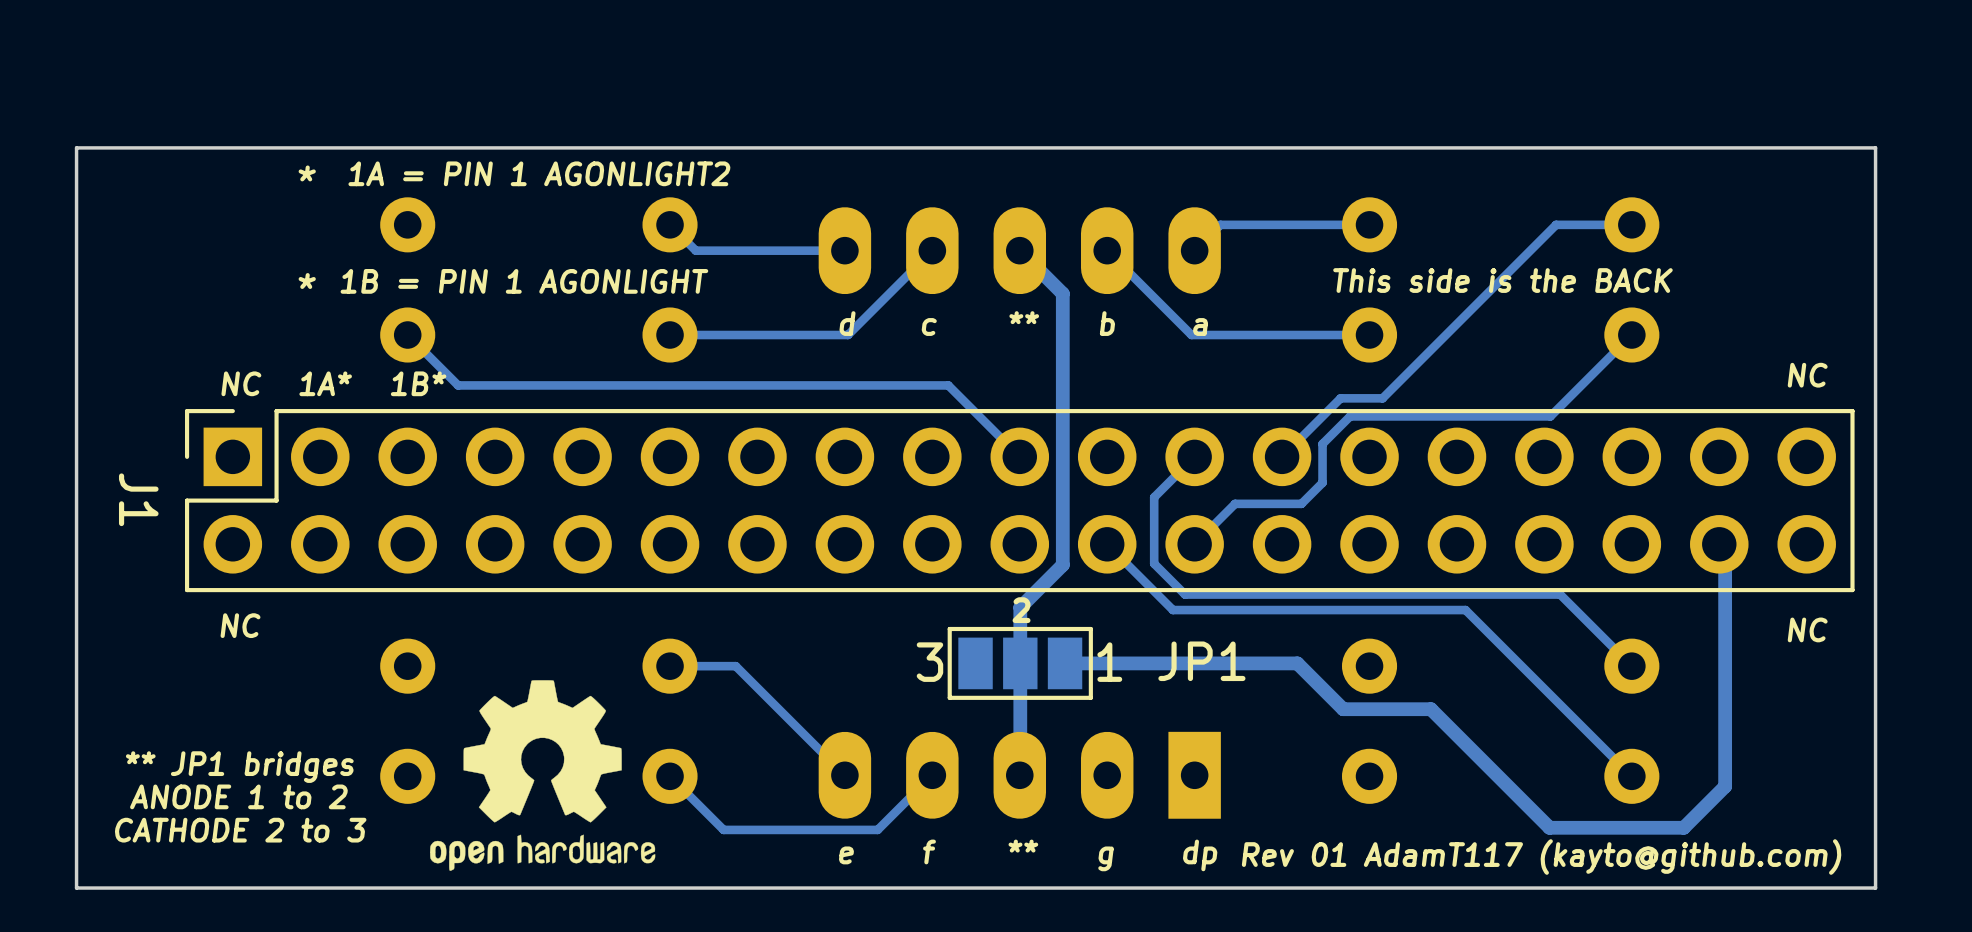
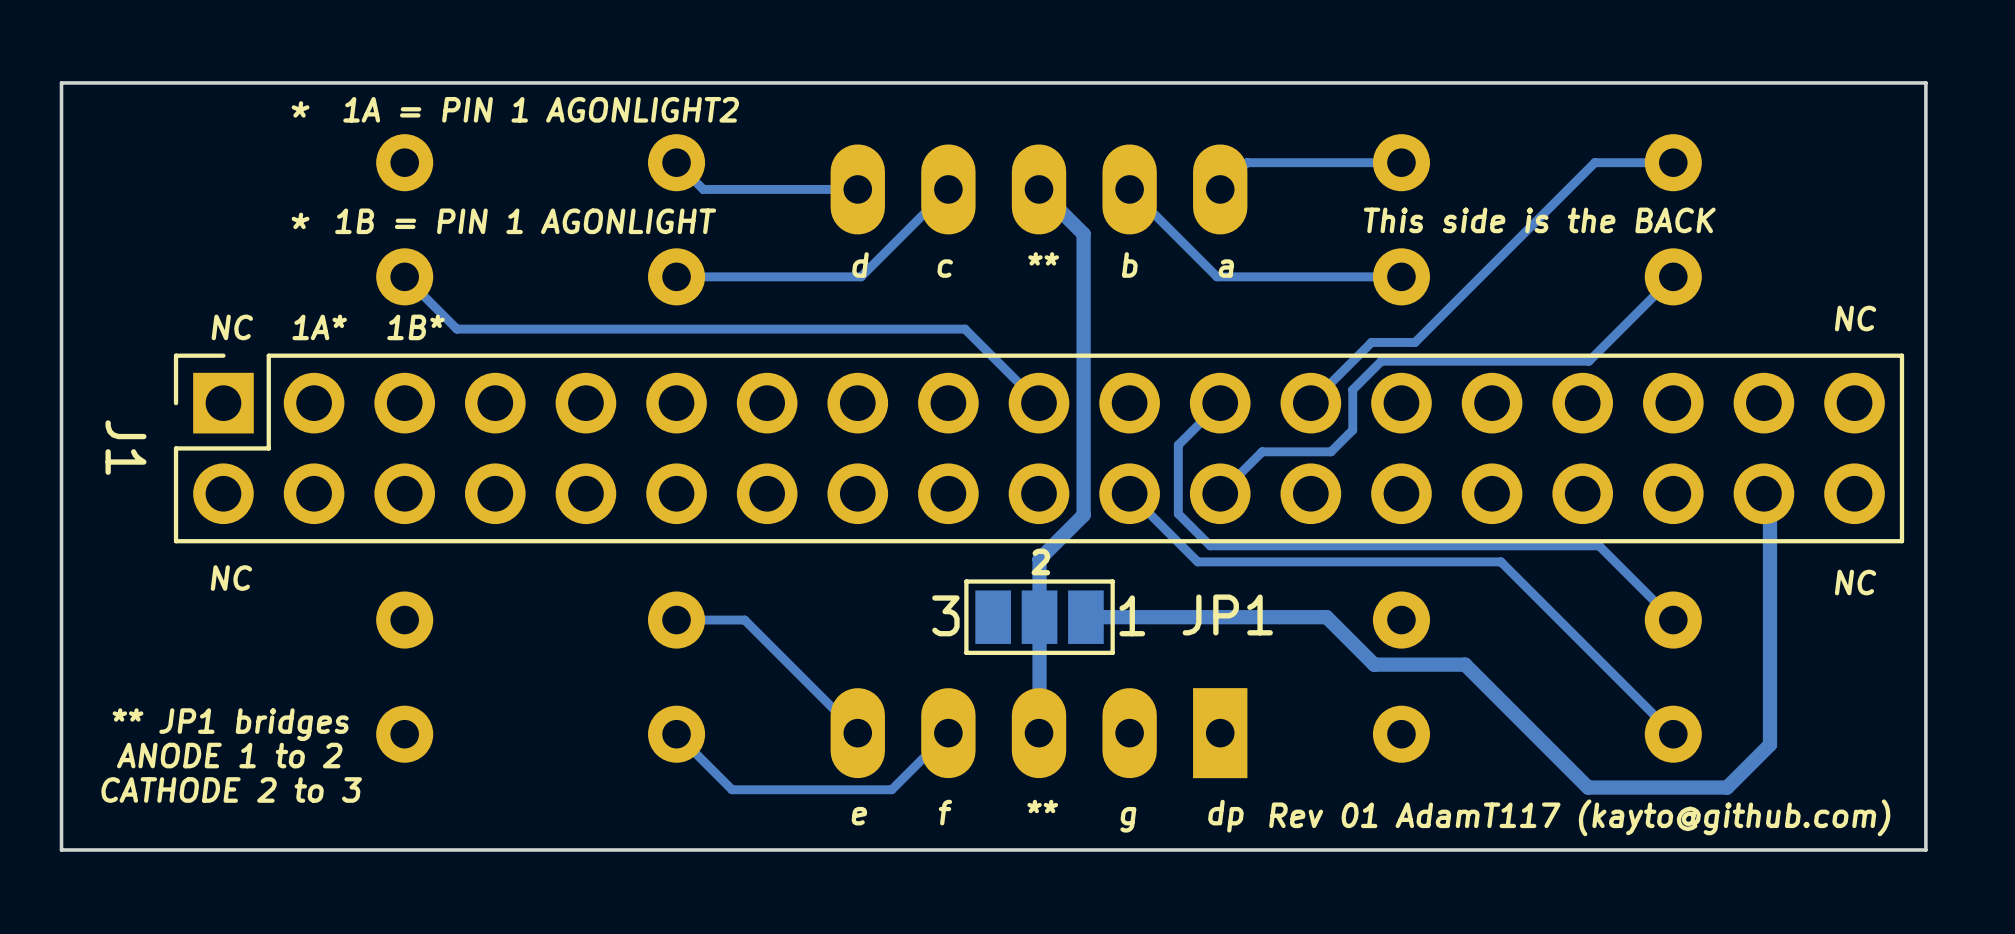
drawing: [430, 680, 656, 871] -> none

